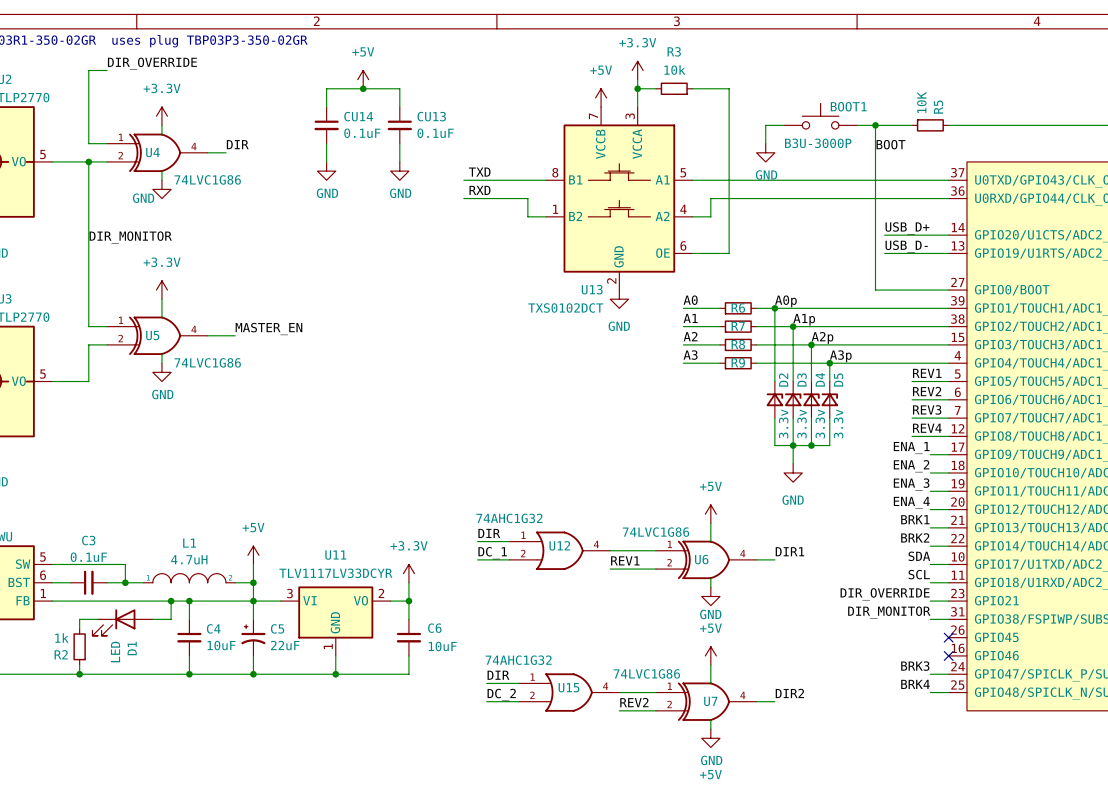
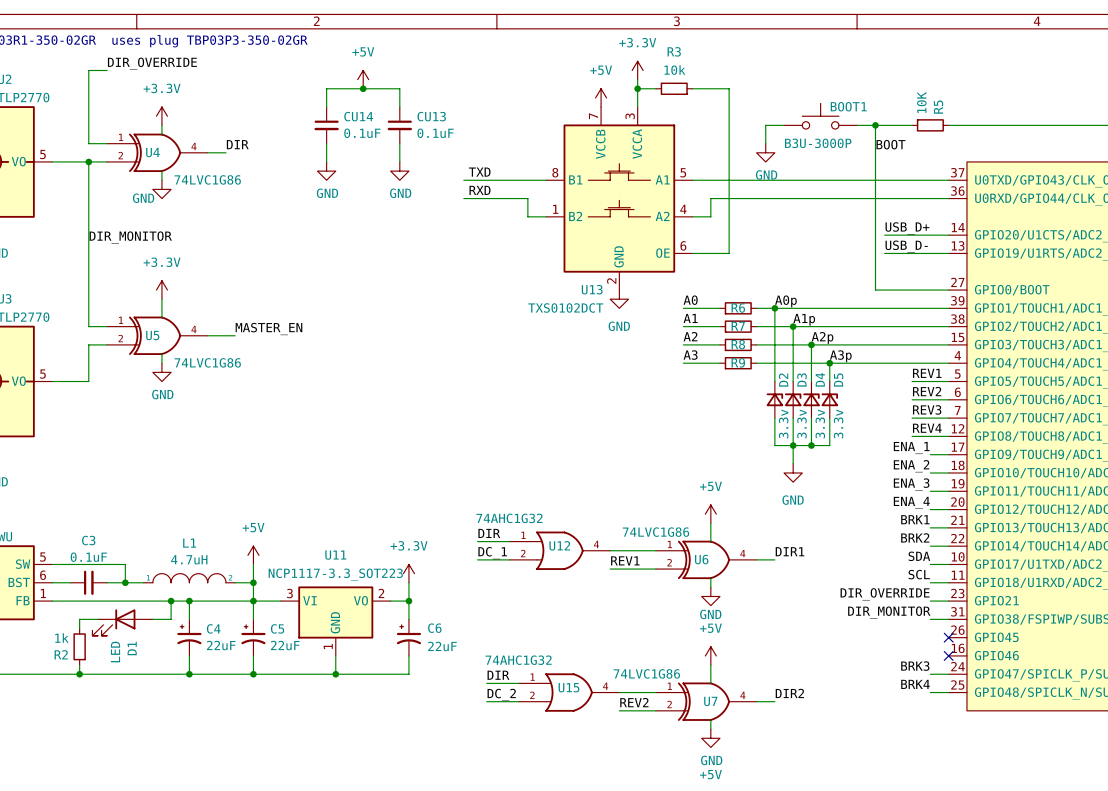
U11 value: TLV1117LV33DCYR (335, 573) -> NCP1117-3.3_SOT223 (335, 574)
C4 symbol: [177, 619, 202, 656] -> [177, 619, 202, 656]
C6 symbol: [396, 619, 422, 656] -> [396, 619, 422, 656]
C4 value: 10uF (221, 645) -> 22uF (221, 645)
C6 value: 10uF (442, 646) -> 22uF (442, 646)

